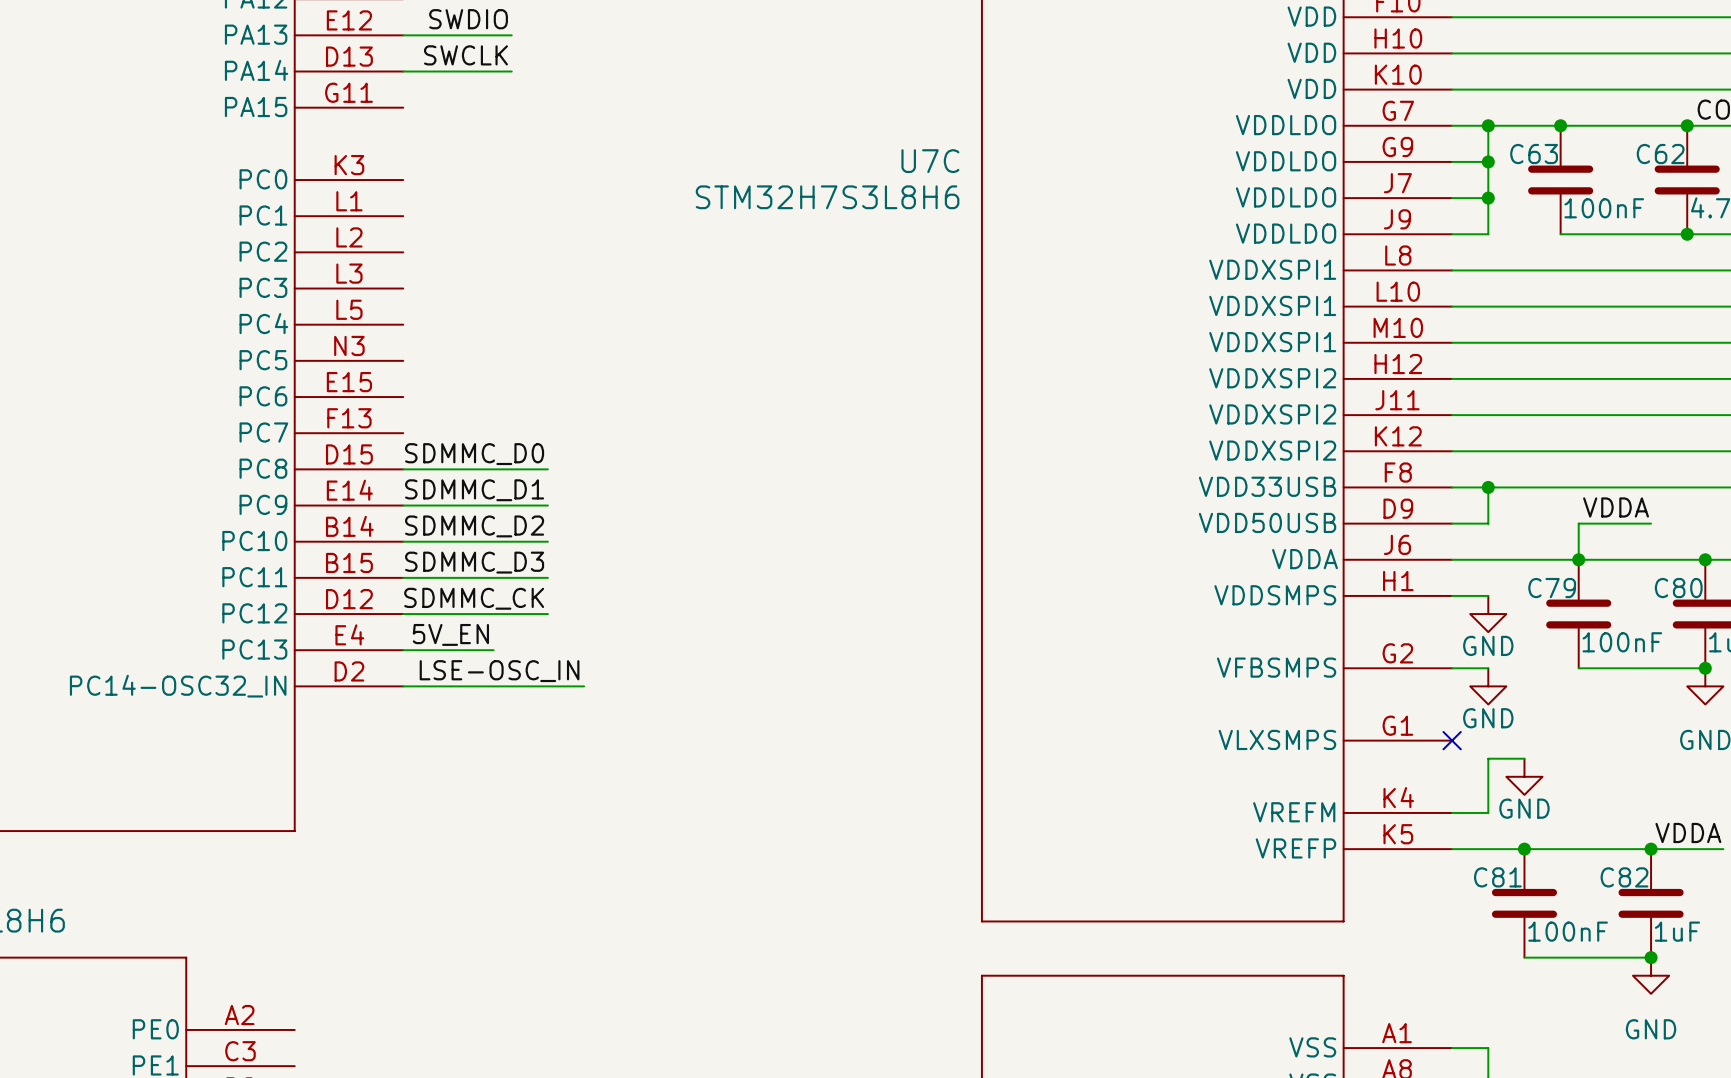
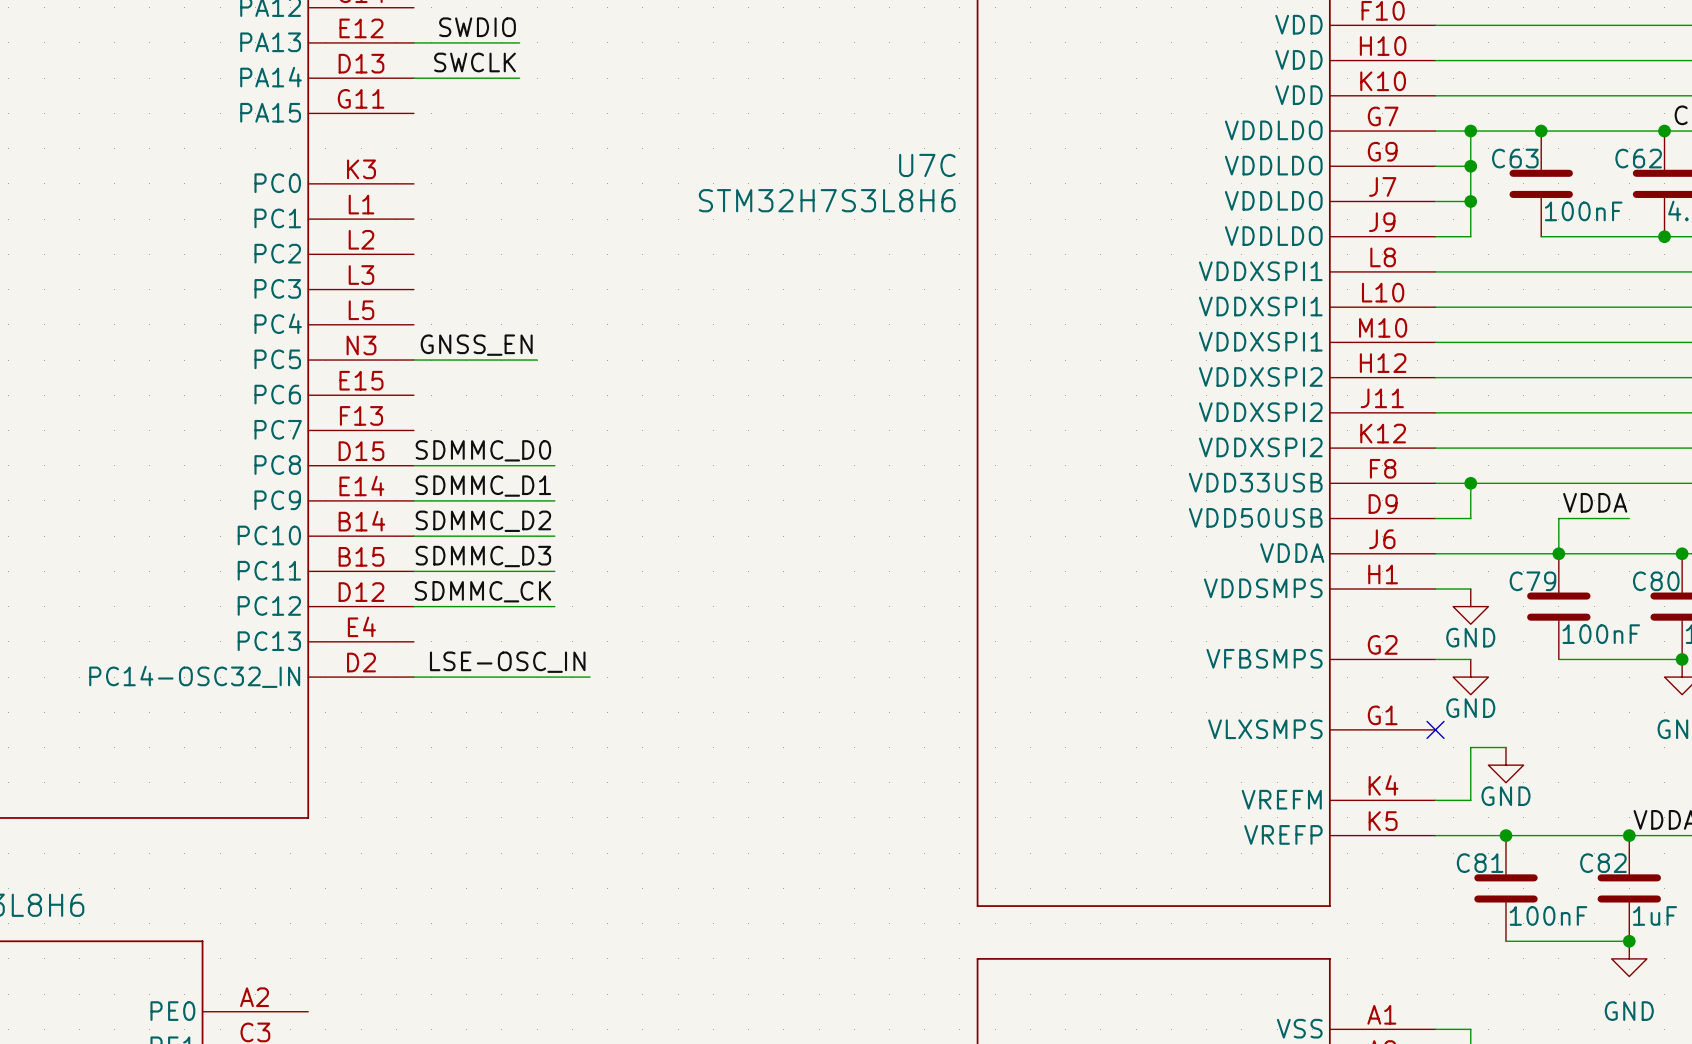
label: none -> GNSS_EN (476, 345)
wire: none -> (413, 360) (537, 360)
label: 5V_EN (450, 634) -> none
wire: (403, 650) (493, 650) -> none

